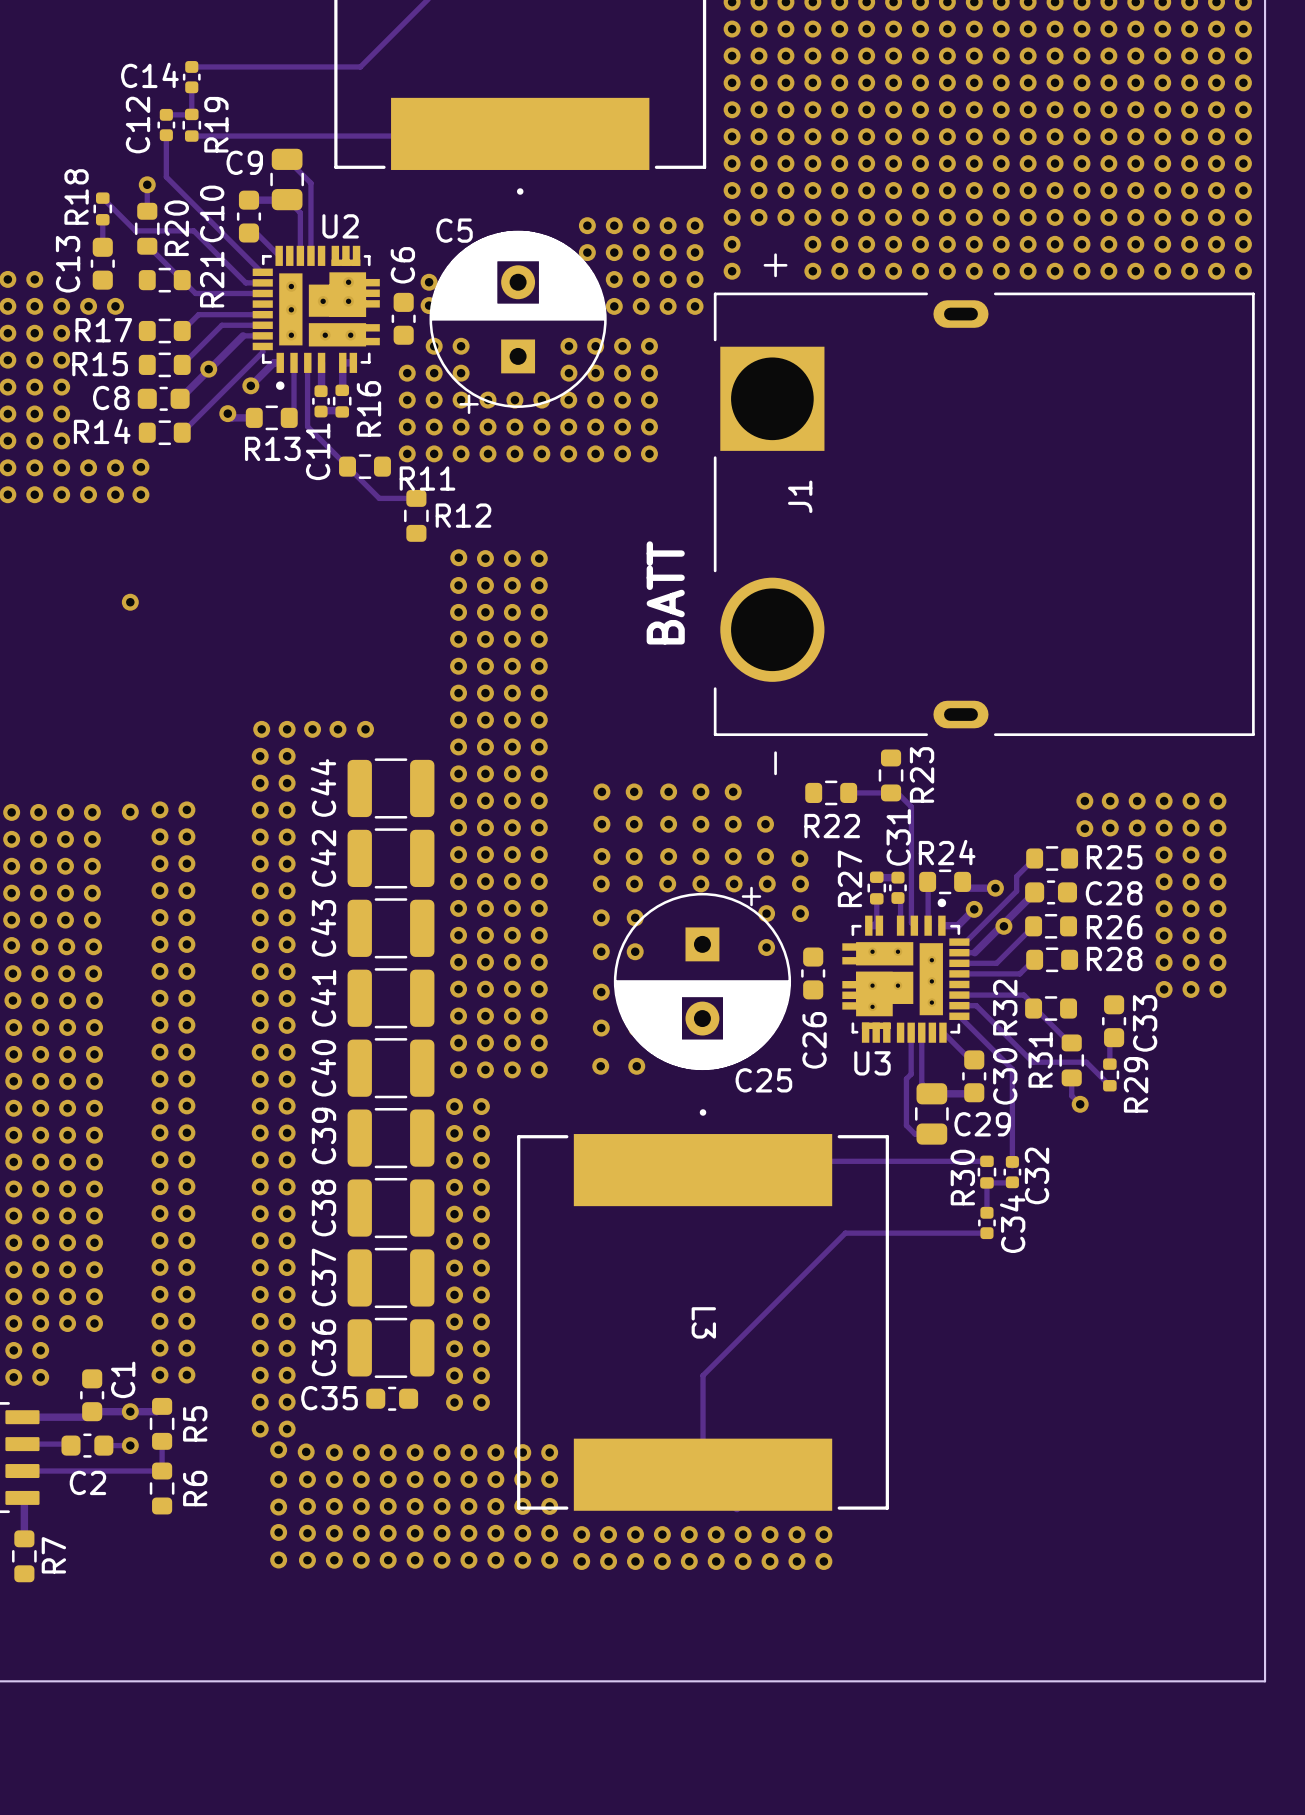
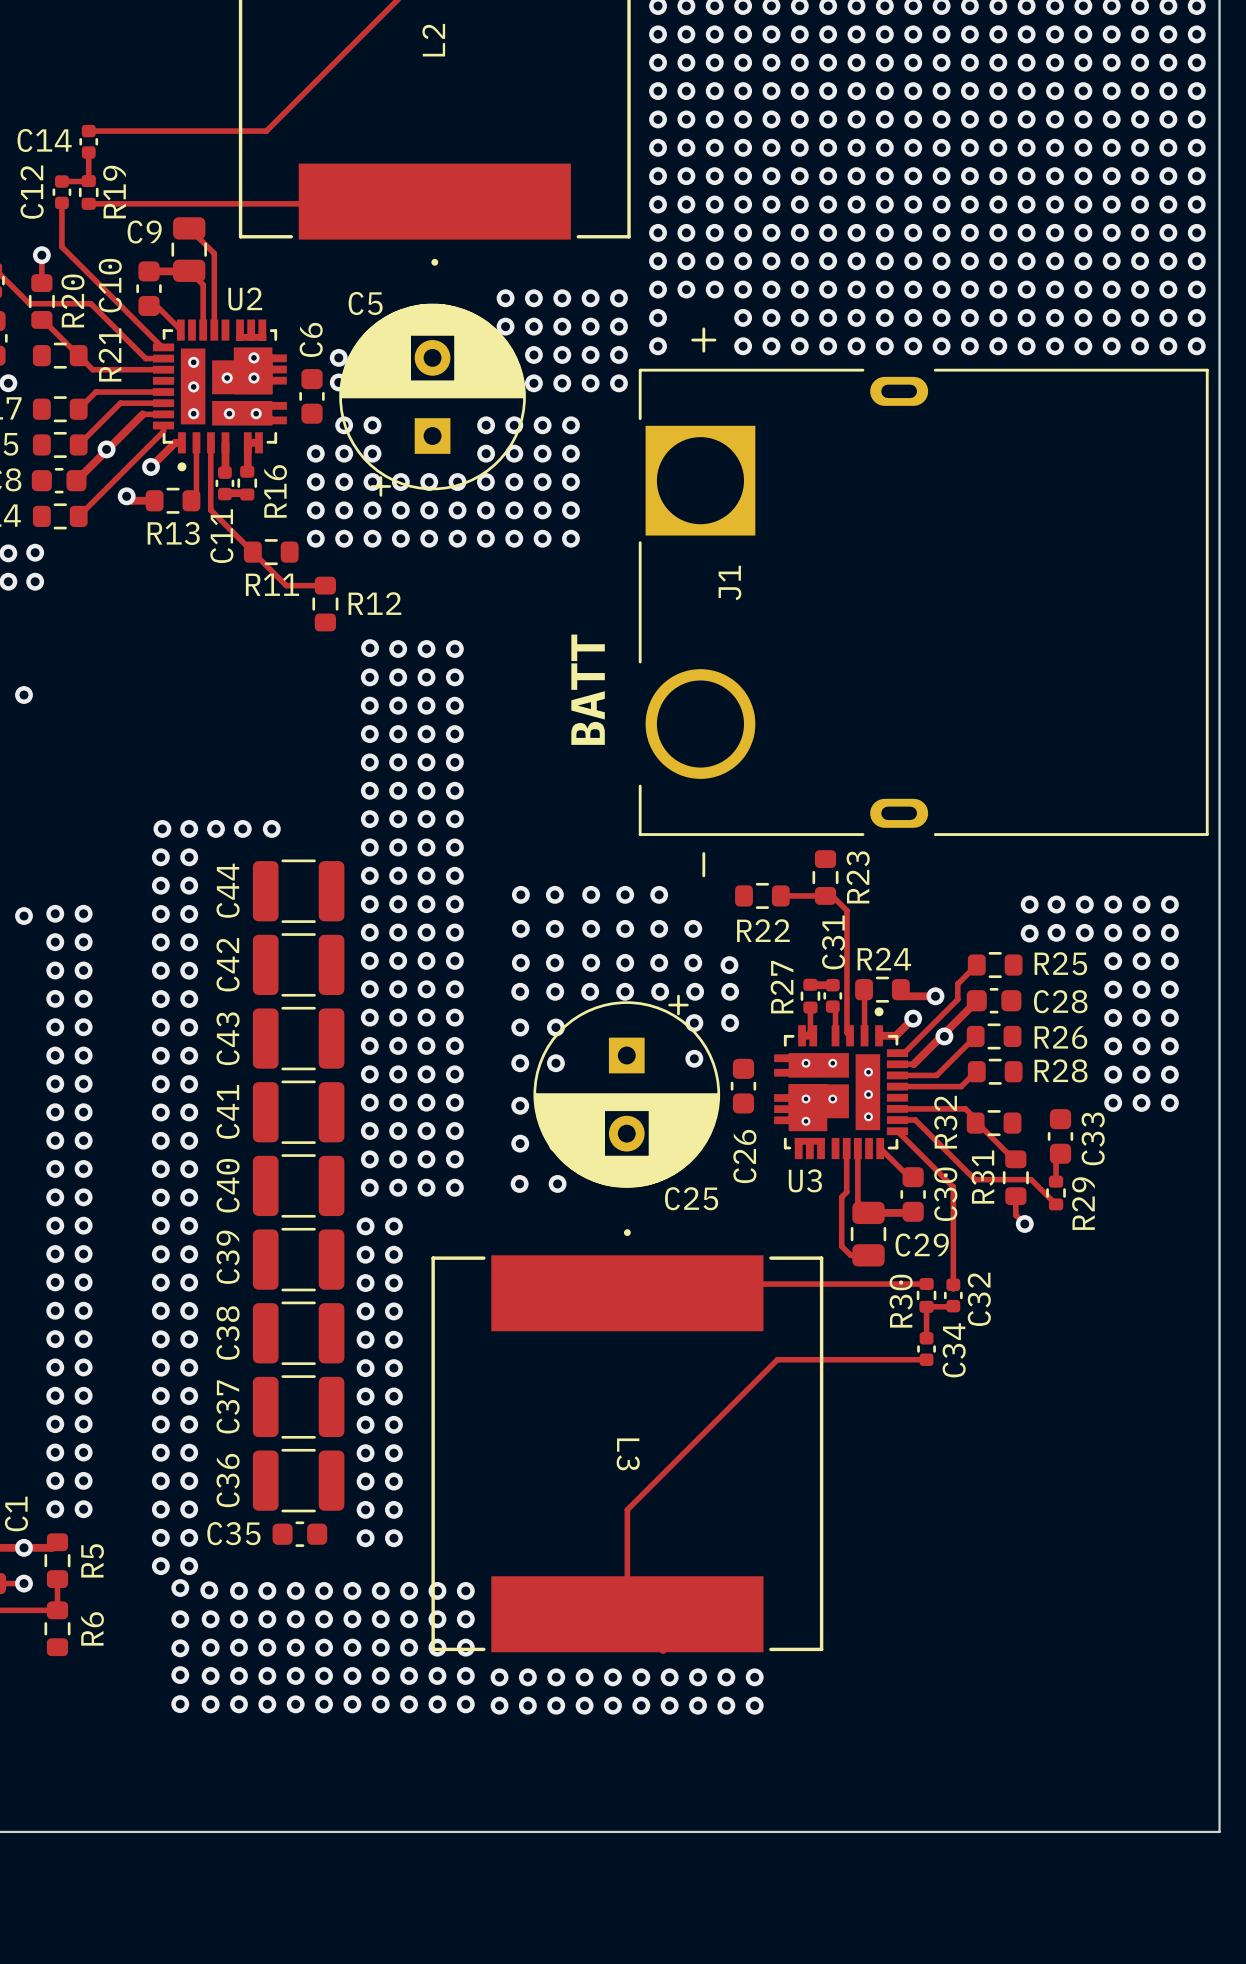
R11 name position: R11 (427, 478) -> R11 (272, 584)

